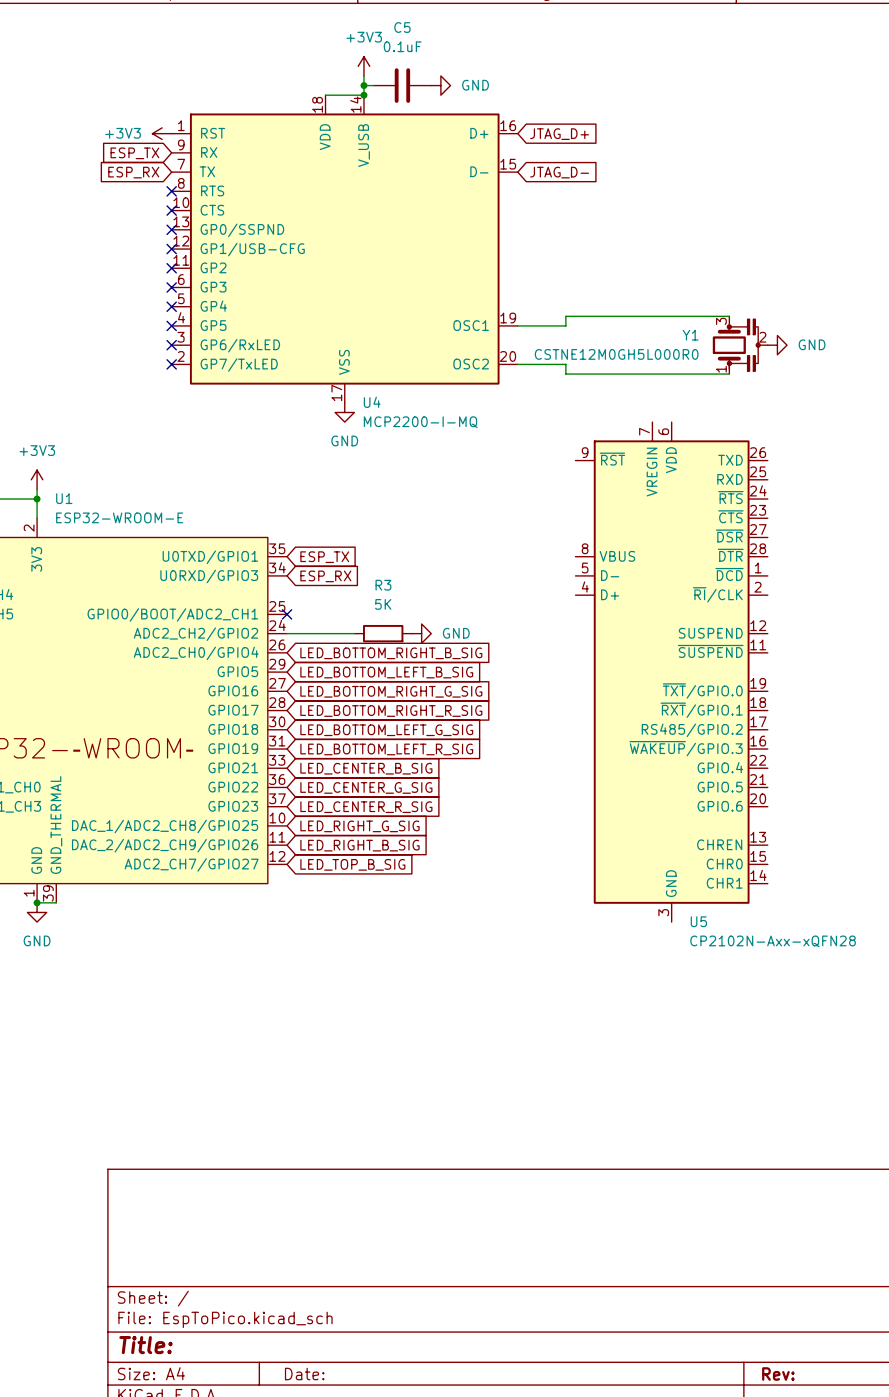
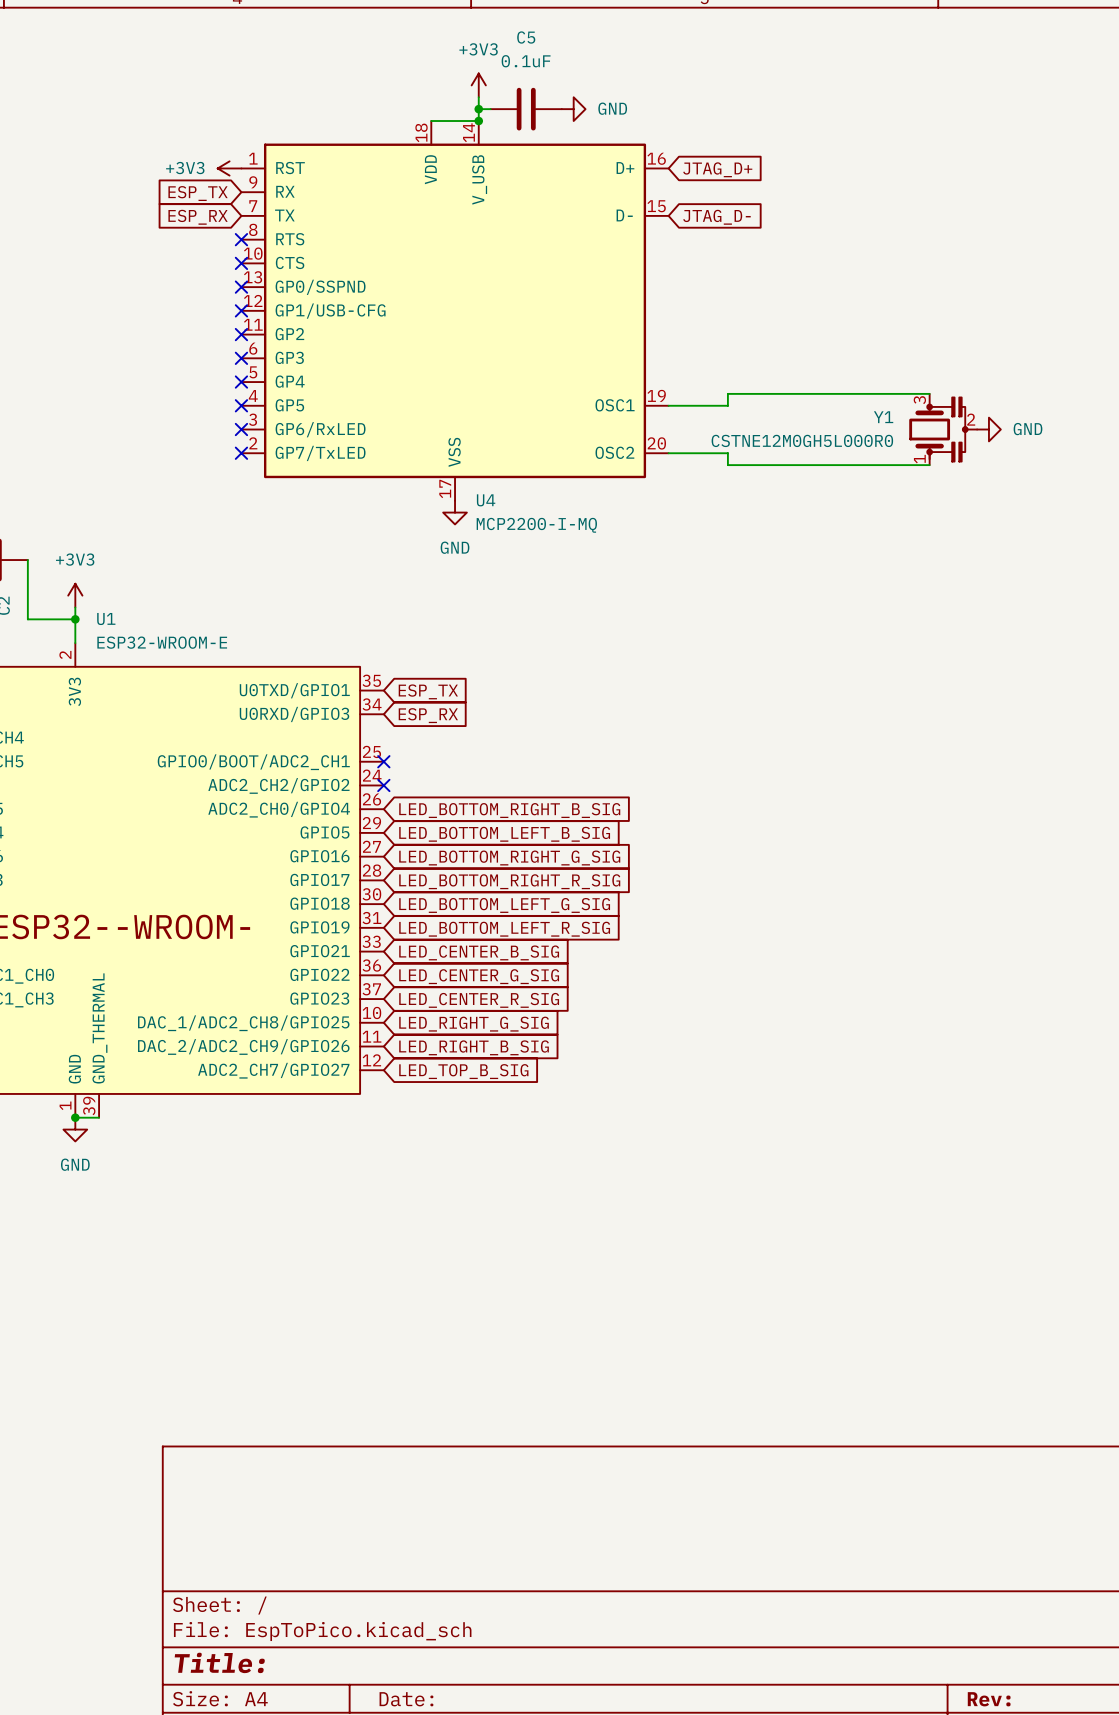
wire: (287, 633) (354, 633) -> none
no-connect mark: none -> (383, 785)
R3: 5K (383, 633) -> none
power symbol: GND (421, 633) -> none
U5: CP2102N-Axx-xQFN28 (671, 672) -> none

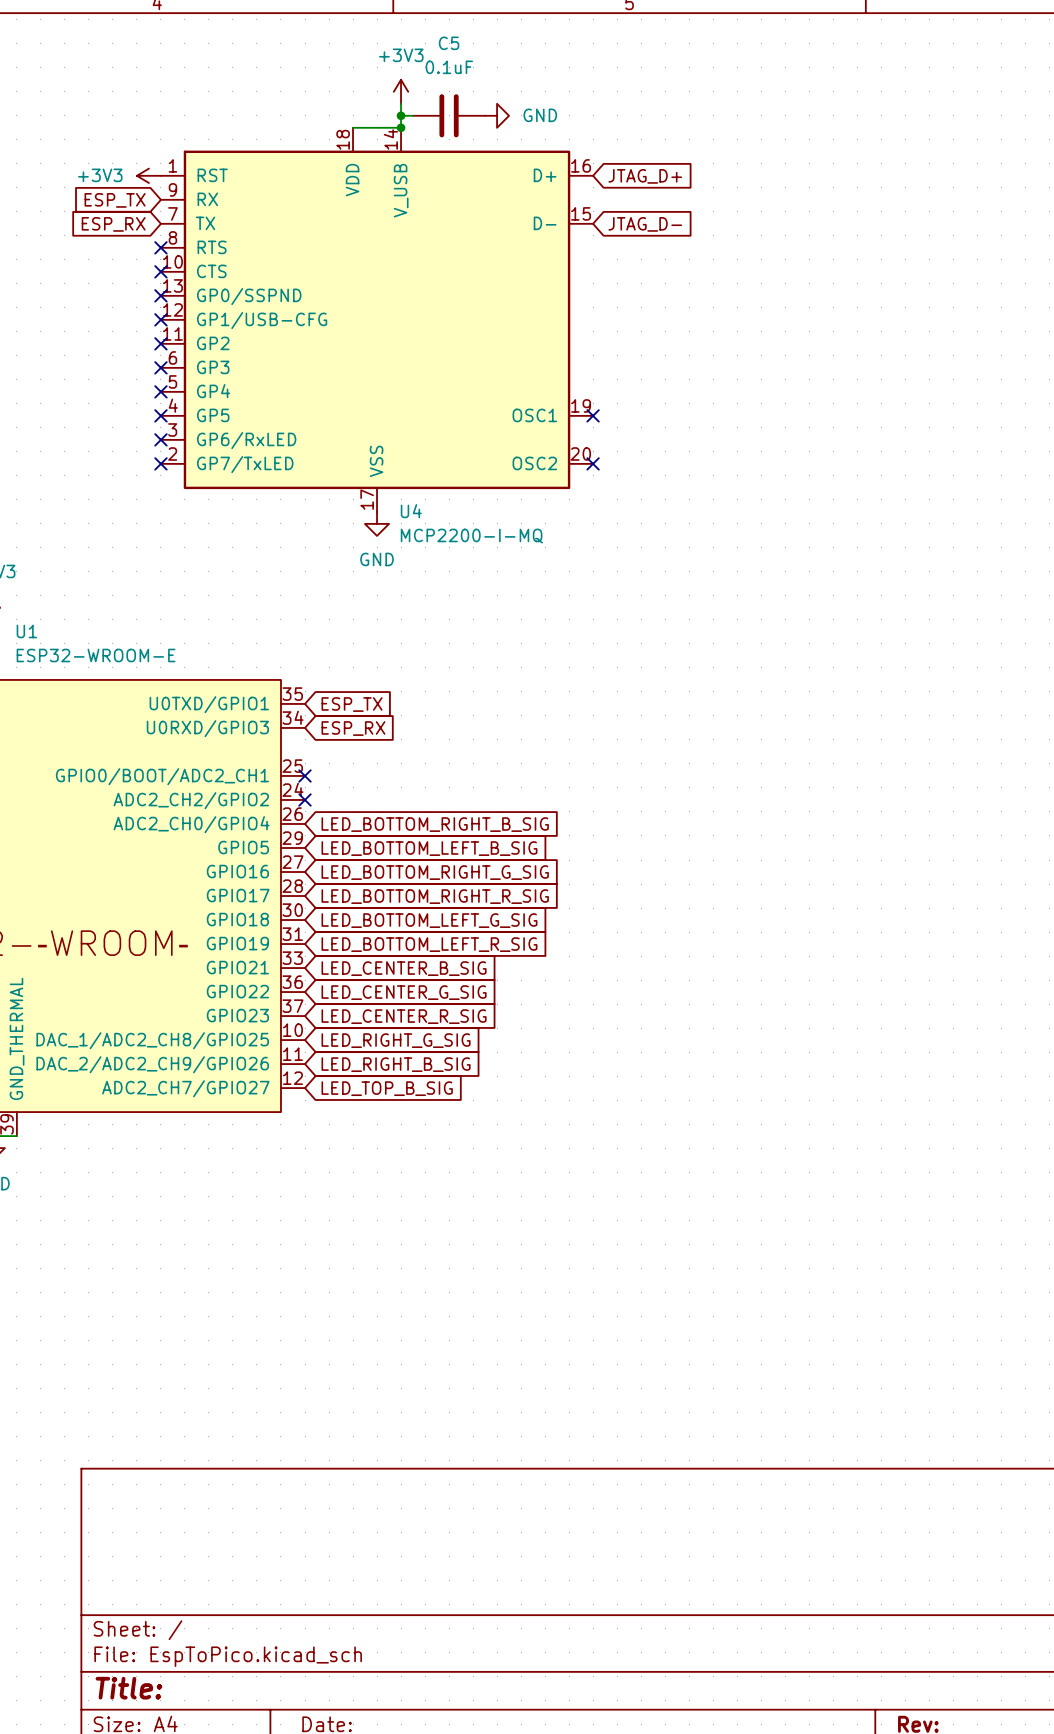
wire: (929, 393) (727, 393) (727, 405) (668, 405) -> none
no-connect mark: none -> (593, 415)
Y1: CSTNE12M0GH5L000R0 (943, 429) -> none
power symbol: GND (988, 429) -> none
wire: (668, 453) (727, 453) (727, 465) (929, 465) -> none
no-connect mark: none -> (593, 463)

